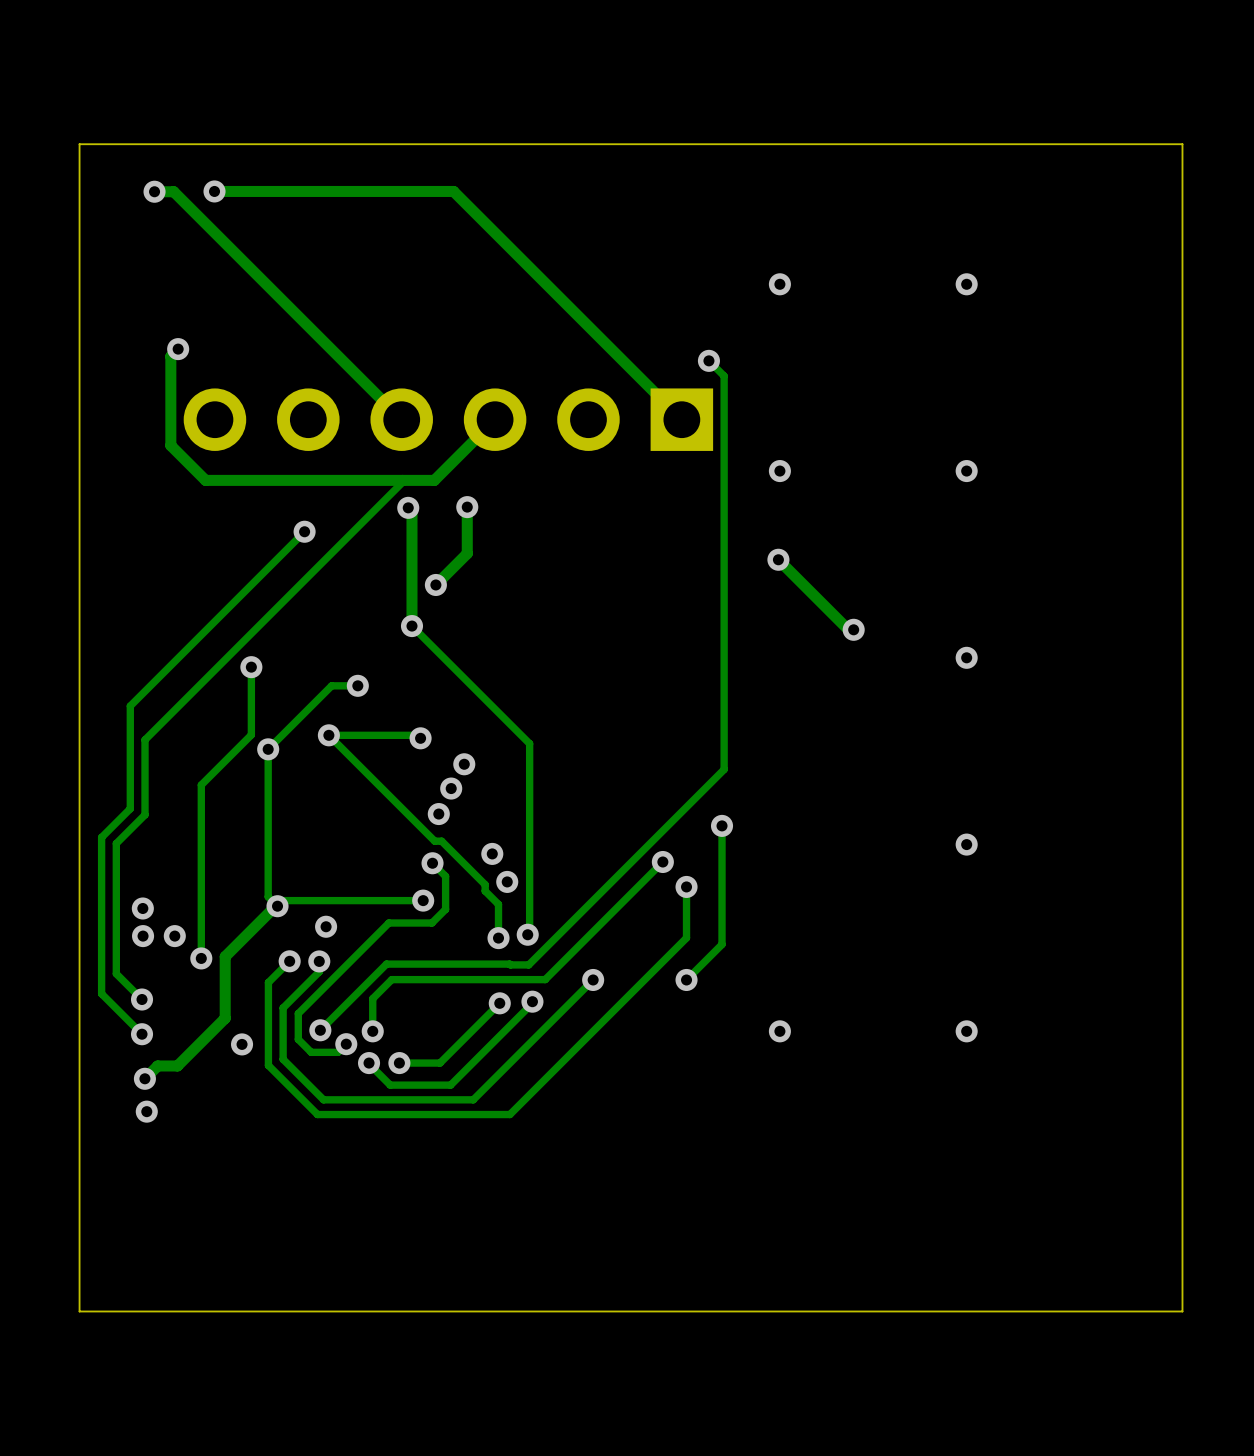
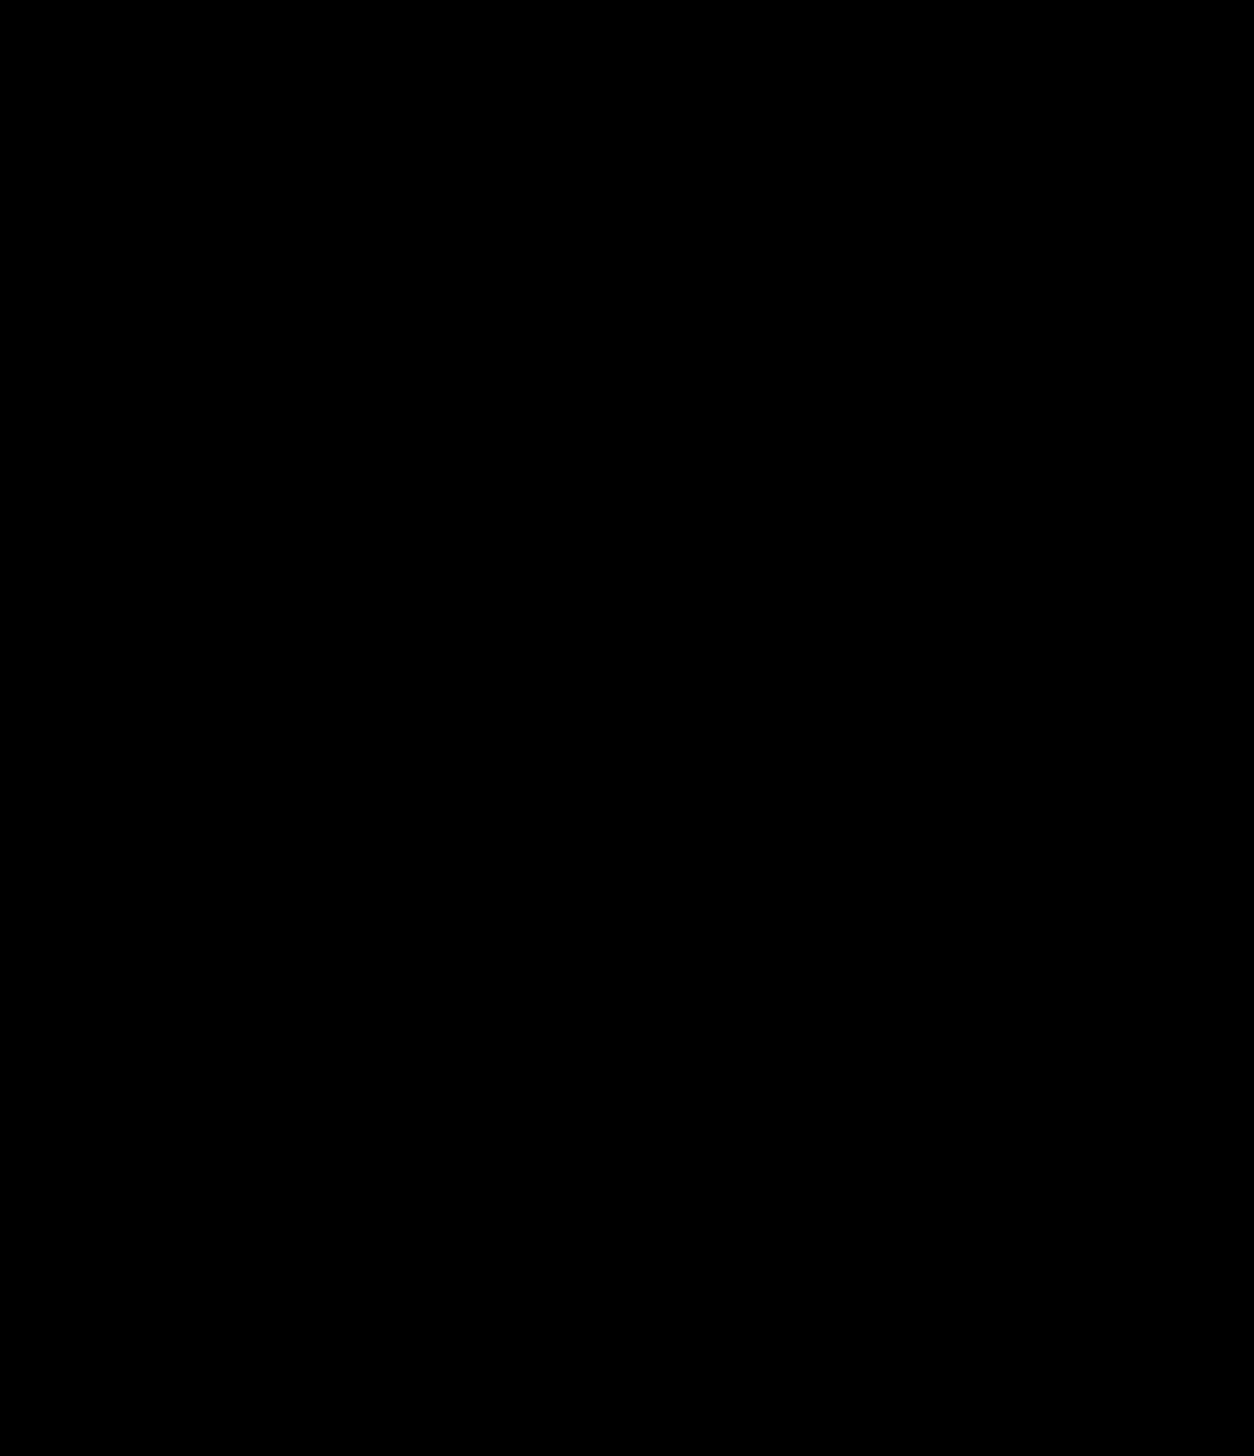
board edge: (1182, 144) (1182, 1311) (79, 1311) (79, 144) (1182, 144) -> none
track: (154, 191) (173, 191) (401, 419) -> none
via: (154, 191) -> none
track: (214, 191) (453, 191) (681, 419) -> none
via: (214, 191) -> none
via: (779, 284) -> none
via: (966, 284) -> none
track: (178, 349) (170, 356) (170, 445) (205, 480) (434, 480) (495, 419) -> none
via: (178, 349) -> none
track: (708, 360) (724, 376) (724, 769) (528, 964) (386, 964) (320, 1030) -> none
via: (708, 360) -> none
part: (448, 419) -> none
via: (779, 471) -> none
via: (966, 471) -> none
track: (402, 480) (145, 739) (145, 814) (116, 843) (116, 973) (142, 999) -> none
track: (408, 507) (411, 511) (411, 626) (529, 743) (529, 932) (527, 934) -> none
via: (408, 507) -> none
track: (467, 507) (467, 553) (435, 584) -> none
via: (467, 507) -> none
track: (304, 531) (130, 706) (130, 808) (101, 837) (101, 993) (142, 1034) -> none
via: (304, 531) -> none
track: (778, 559) (848, 629) (853, 629) -> none
via: (778, 559) -> none
via: (435, 584) -> none
via: (411, 626) -> none
via: (853, 629) -> none
via: (966, 657) -> none
track: (251, 667) (251, 734) (201, 785) (201, 958) -> none
via: (251, 667) -> none
track: (357, 685) (331, 685) (268, 749) (268, 896) (277, 906) -> none
via: (357, 685) -> none
via: (328, 735) -> none
track: (420, 738) (417, 735) (328, 735) (434, 841) (441, 841) (485, 884) (485, 891) (498, 904) (498, 938) -> none
via: (420, 738) -> none
via: (268, 749) -> none
via: (464, 764) -> none
via: (451, 788) -> none
via: (438, 814) -> none
track: (722, 825) (722, 944) (686, 979) -> none
via: (722, 825) -> none
via: (966, 844) -> none
via: (492, 853) -> none
track: (662, 862) (545, 979) (391, 979) (372, 998) (372, 1031) -> none
via: (662, 862) -> none
track: (432, 863) (445, 876) (445, 909) (431, 923) (388, 923) (298, 1013) (298, 1039) (311, 1052) (338, 1052) (346, 1044) -> none
via: (432, 863) -> none
via: (507, 881) -> none
track: (686, 886) (686, 937) (509, 1114) (317, 1114) (268, 1065) (268, 982) (289, 961) -> none
via: (686, 886) -> none
track: (423, 900) (283, 900) (277, 906) -> none
via: (423, 900) -> none
track: (277, 906) (225, 956) (225, 1018) (177, 1065) (157, 1065) (144, 1078) -> none
via: (277, 906) -> none
via: (142, 908) -> none
via: (326, 926) -> none
via: (527, 934) -> none
via: (143, 936) -> none
via: (174, 936) -> none
via: (498, 938) -> none
via: (201, 958) -> none
via: (289, 961) -> none
track: (319, 961) (319, 971) (283, 1007) (283, 1059) (323, 1099) (473, 1099) (593, 979) -> none
via: (319, 961) -> none
via: (593, 979) -> none
via: (686, 979) -> none
via: (142, 999) -> none
track: (532, 1001) (450, 1085) (390, 1085) (369, 1063) -> none
via: (532, 1001) -> none
track: (499, 1003) (440, 1063) (399, 1063) -> none
via: (499, 1003) -> none
via: (320, 1030) -> none
via: (372, 1031) -> none
via: (779, 1031) -> none
via: (966, 1031) -> none
via: (142, 1034) -> none
via: (242, 1044) -> none
via: (346, 1044) -> none
via: (369, 1063) -> none
via: (399, 1063) -> none
via: (144, 1078) -> none
via: (146, 1111) -> none

